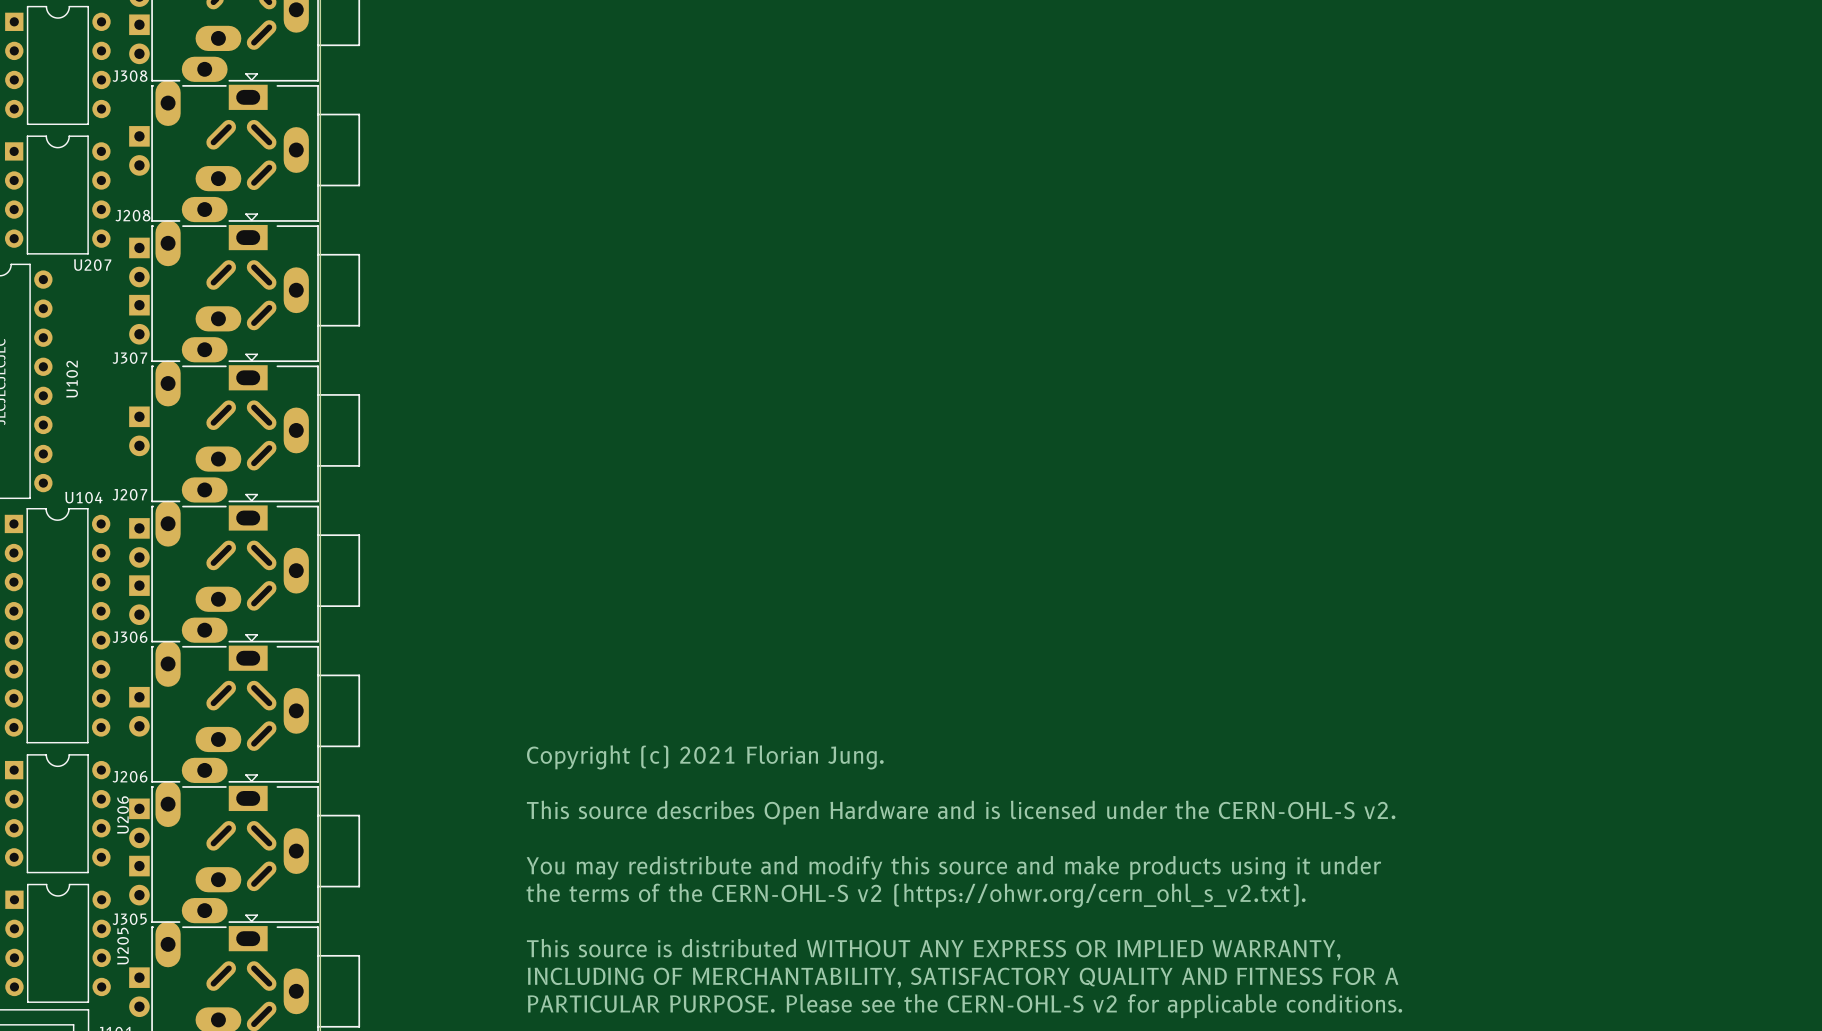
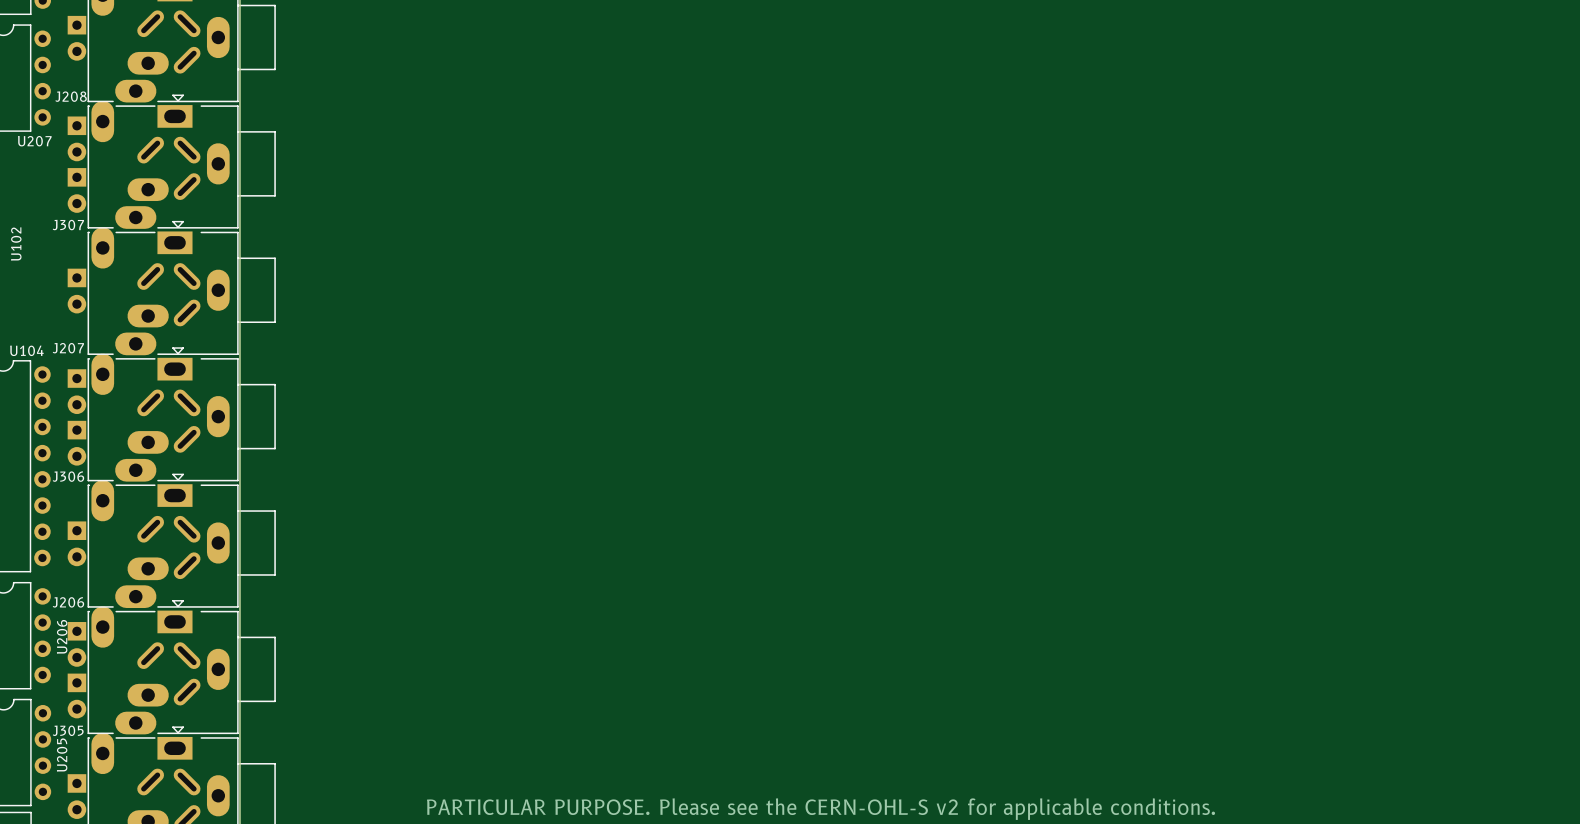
text: Copyright (c) 2021 Florian Jung. (705, 757) -> none
text: This source describes Open Hardware and is licensed under the CERN-OHL-S v2. (961, 812) -> none
text: You may redistribute and modify this source and make products using it under (953, 868) -> none
text: the terms of the CERN-OHL-S v2 (https://ohwr.org/cern_ohl_s_v2.txt). (916, 895) -> none
text: This source is distributed WITHOUT ANY EXPRESS OR IMPLIED WARRANTY, (933, 949) -> none
text: INCLUDING OF MERCHANTABILITY, SATISFACTORY QUALITY AND FITNESS FOR A (963, 977) -> none

